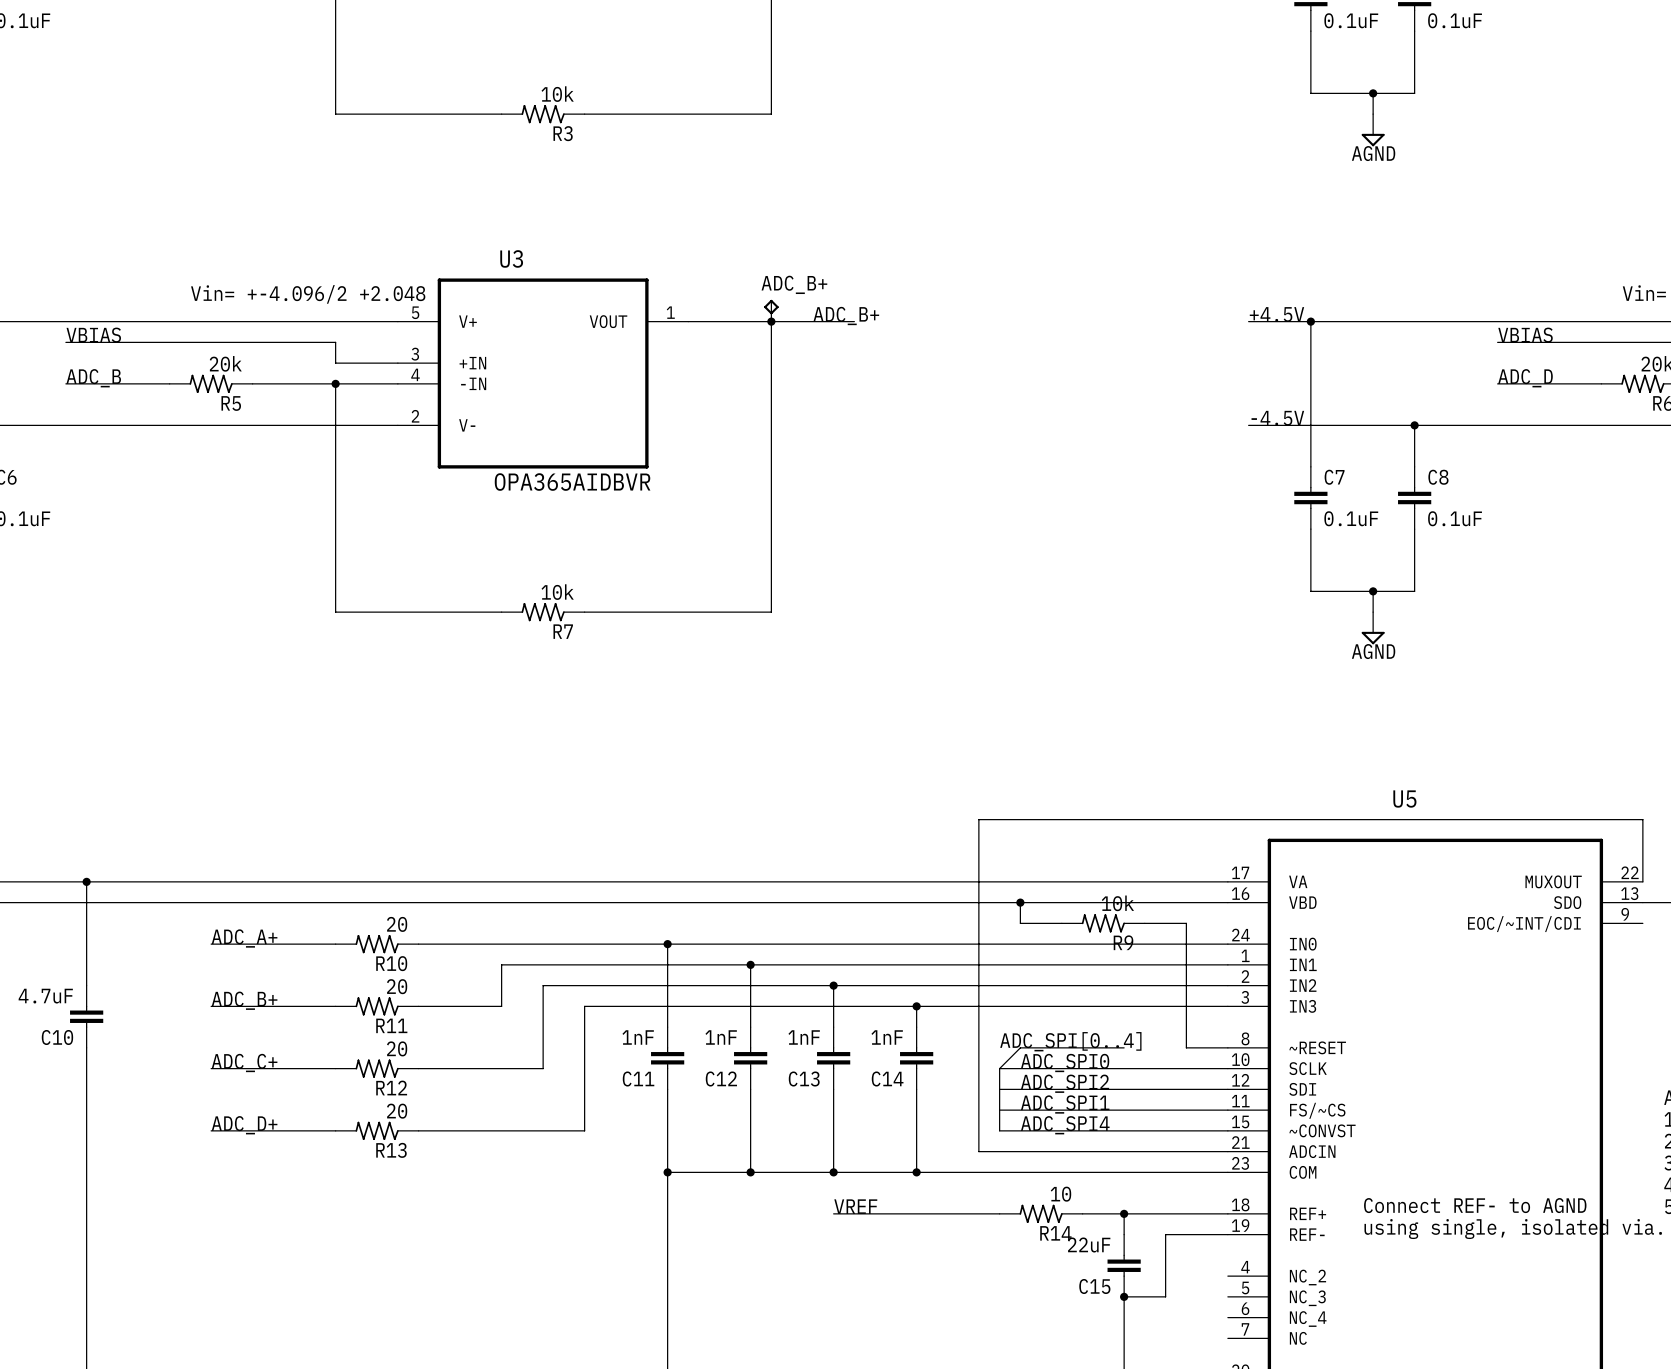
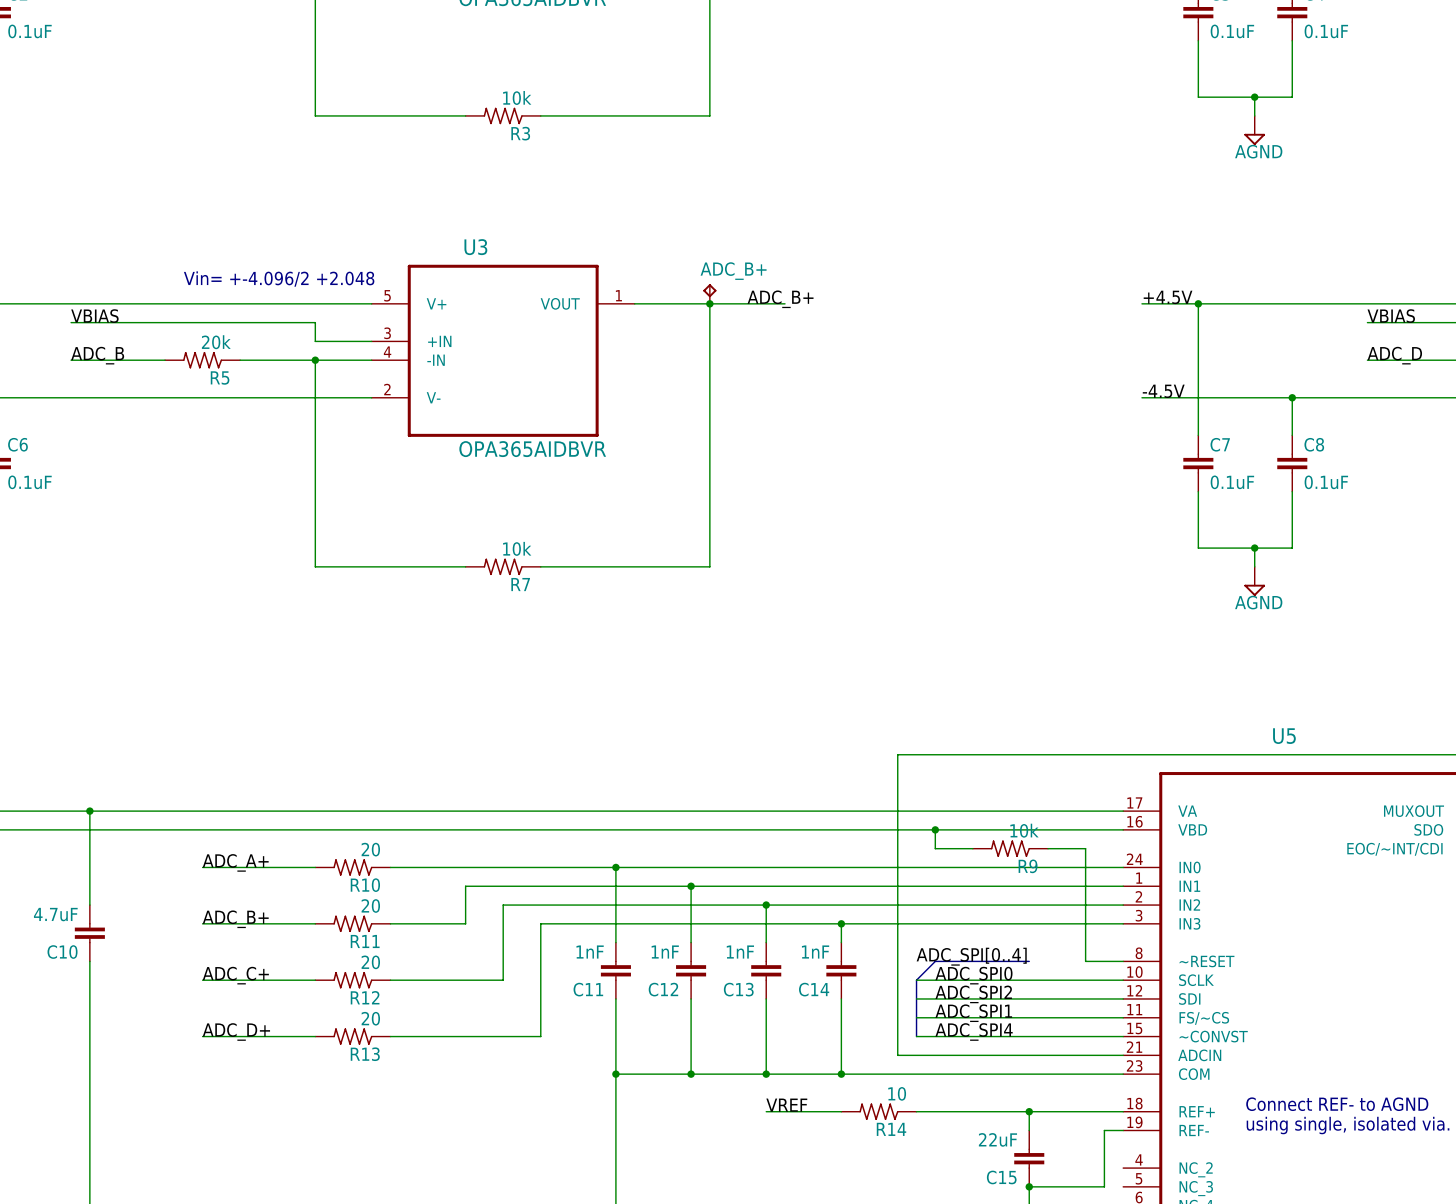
R14 position: (1041, 1213) -> (878, 1111)
wire: (1207, 1234) (1165, 1234) (1165, 1296) -> (1104, 1130) (1104, 1186) (1066, 1186)

